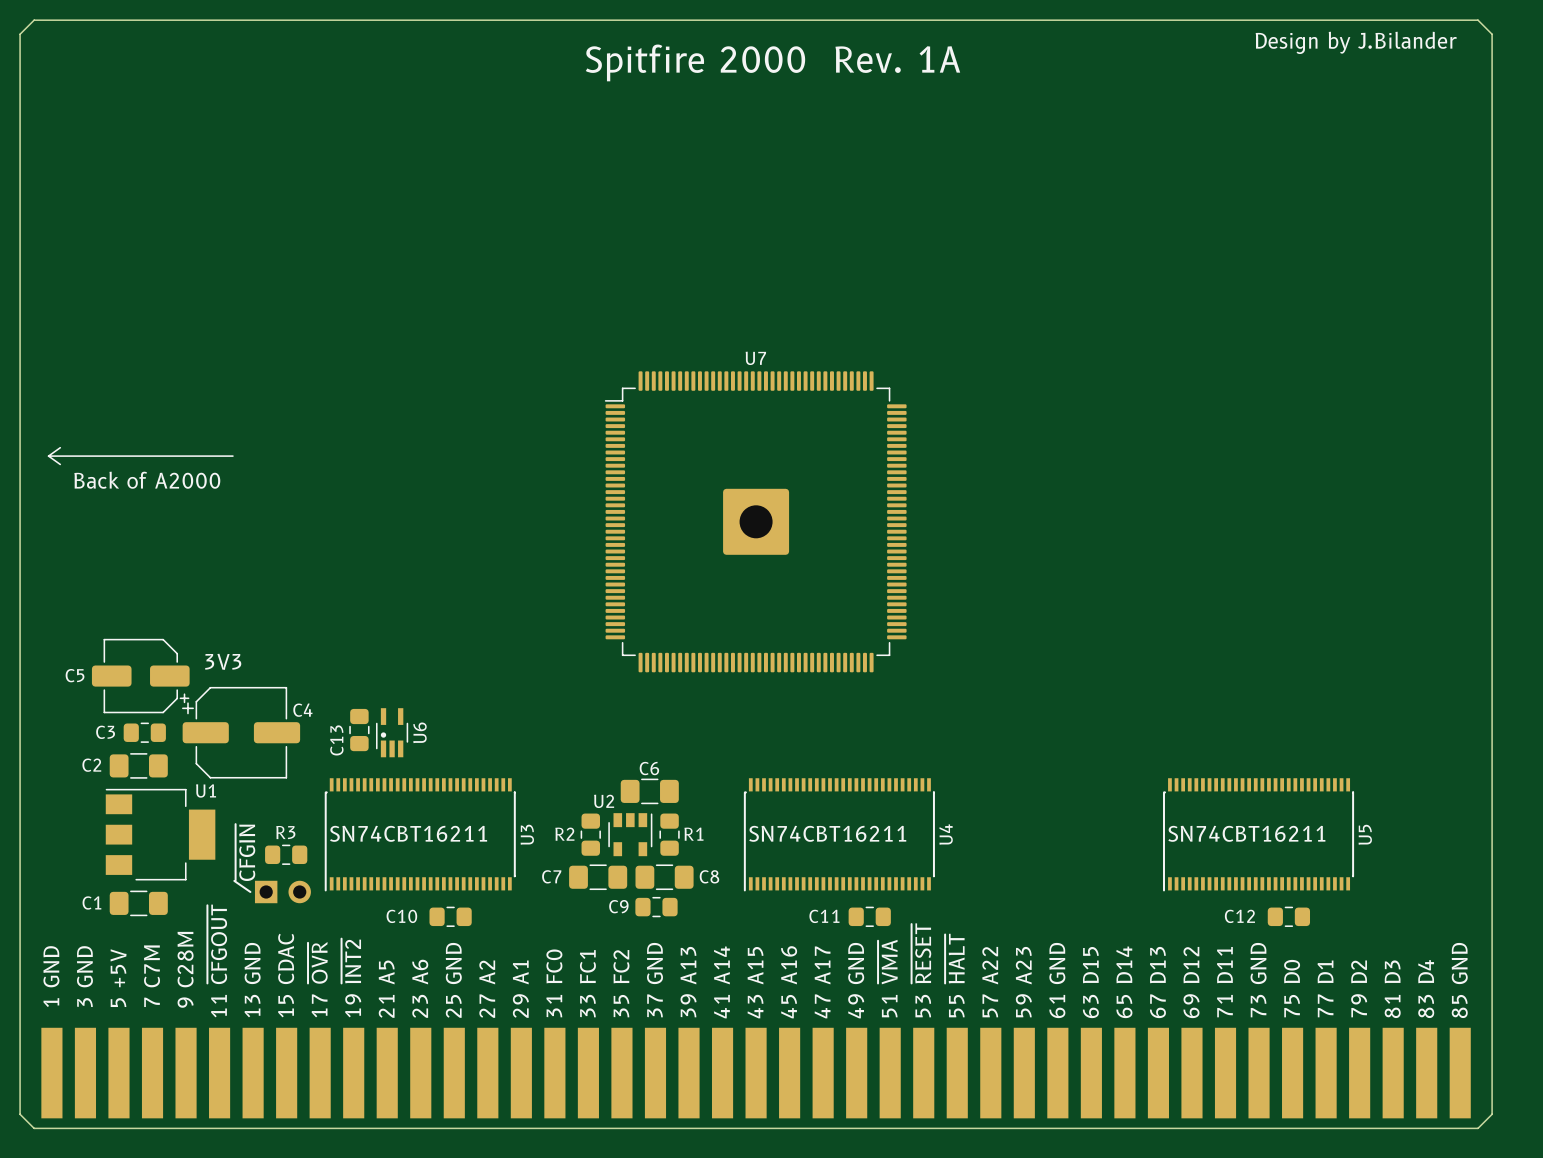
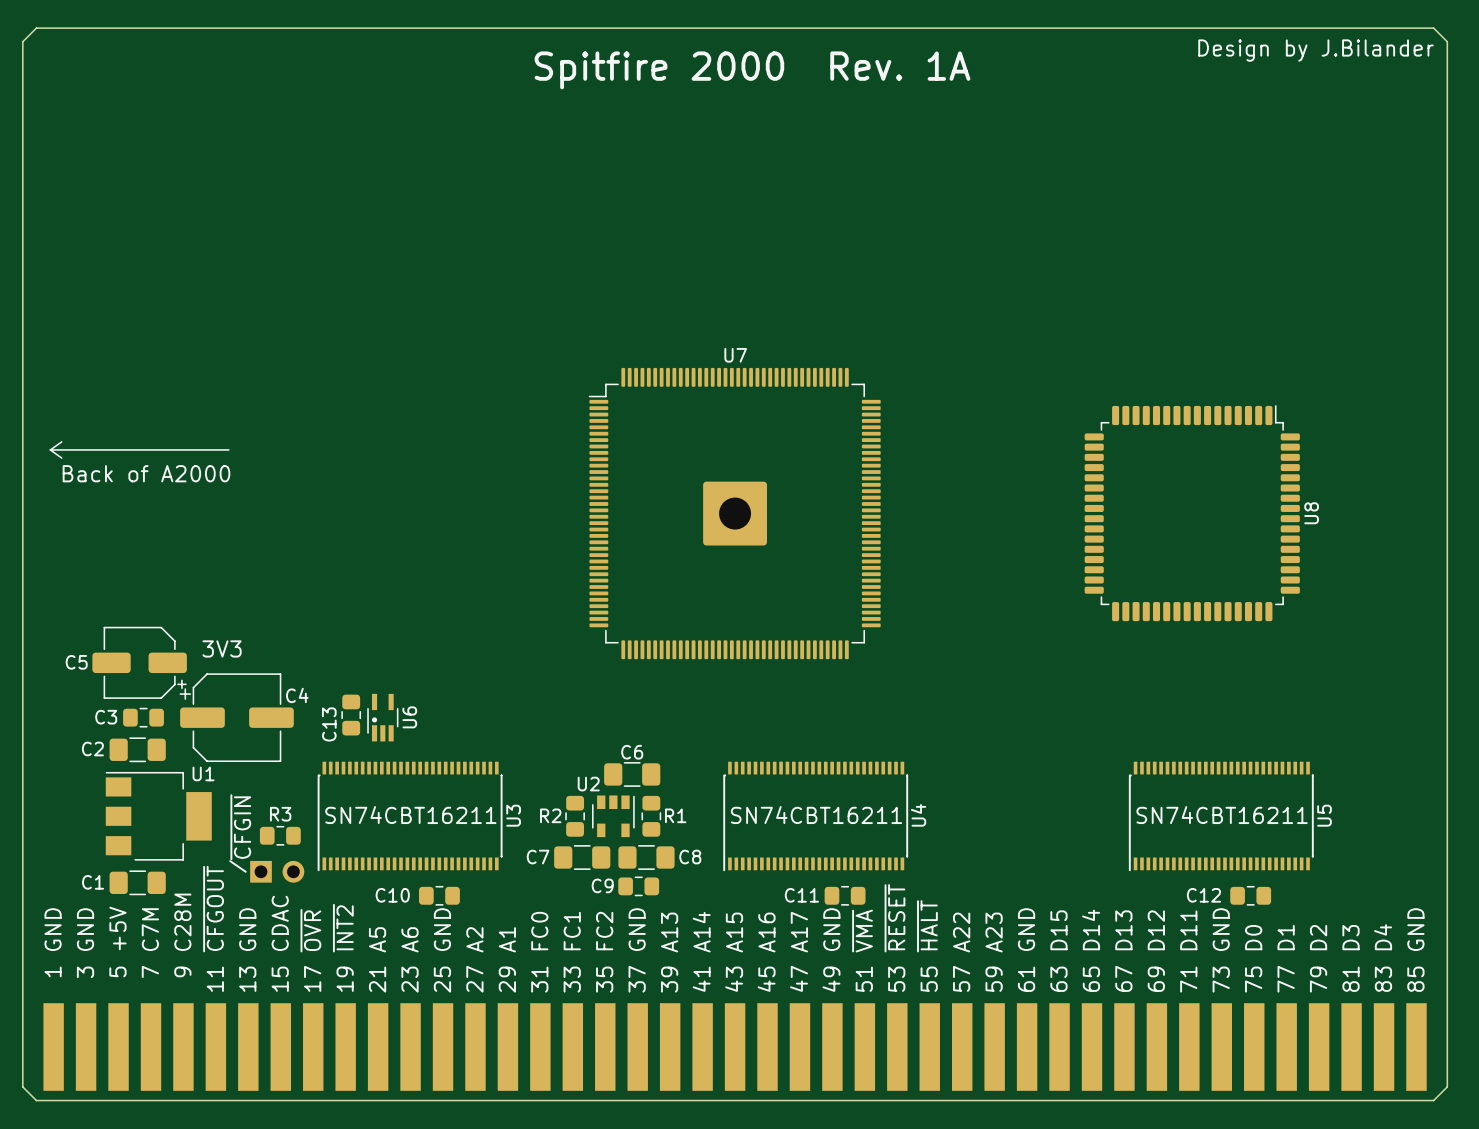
U8: none -> (1192, 513)

